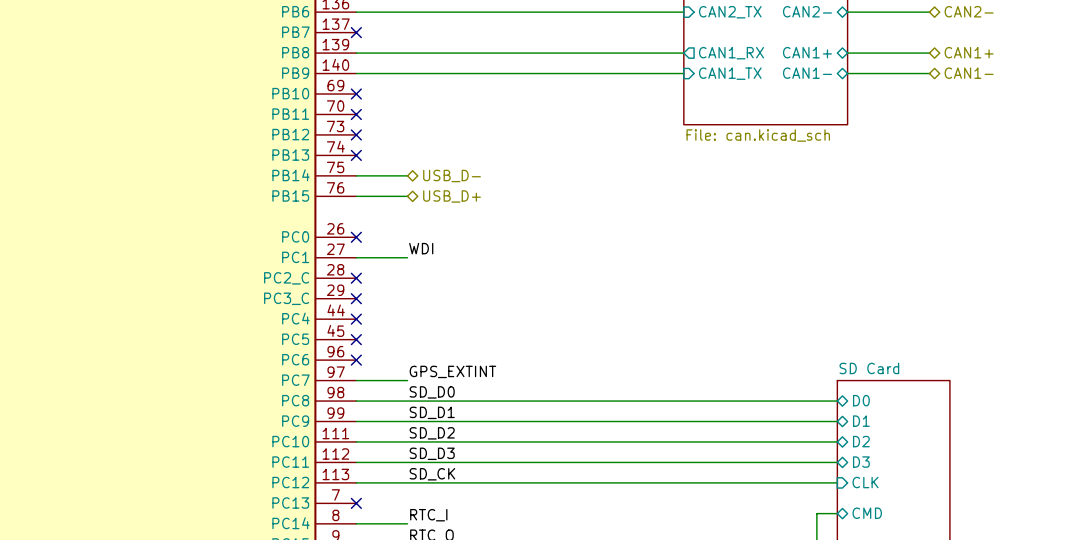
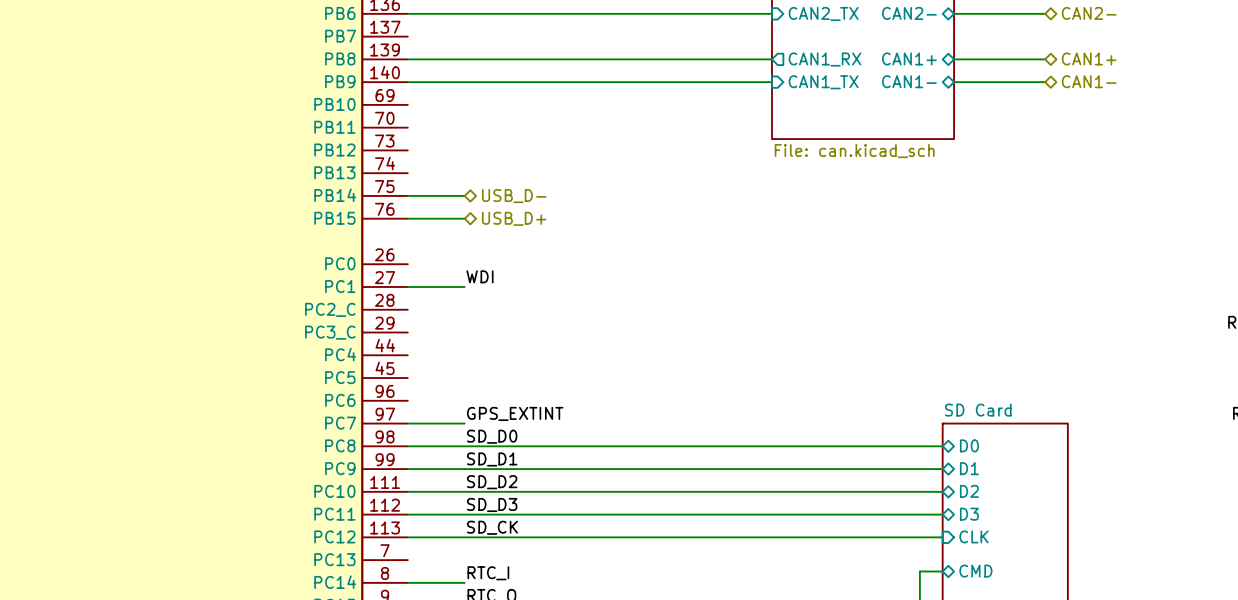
no-connect mark: (356, 32) -> none
no-connect mark: (356, 94) -> none
no-connect mark: (356, 114) -> none
no-connect mark: (356, 134) -> none
no-connect mark: (356, 155) -> none
no-connect mark: (356, 237) -> none
no-connect mark: (356, 278) -> none
no-connect mark: (356, 298) -> none
no-connect mark: (356, 319) -> none
no-connect mark: (356, 339) -> none
no-connect mark: (356, 360) -> none
no-connect mark: (356, 503) -> none

